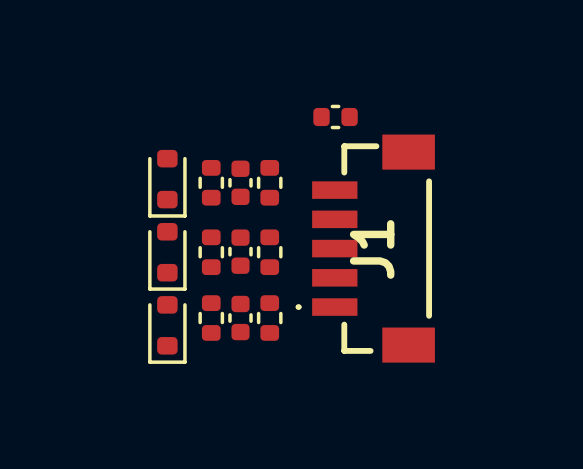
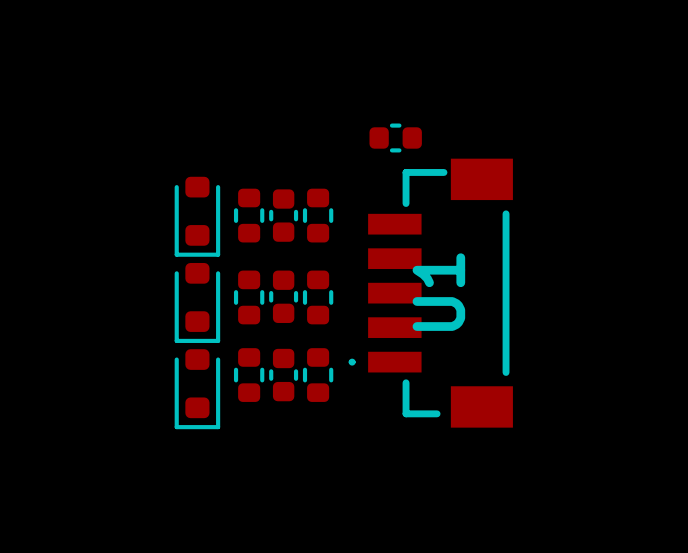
J1 name: J1 (372, 249) -> U1 (438, 292)

